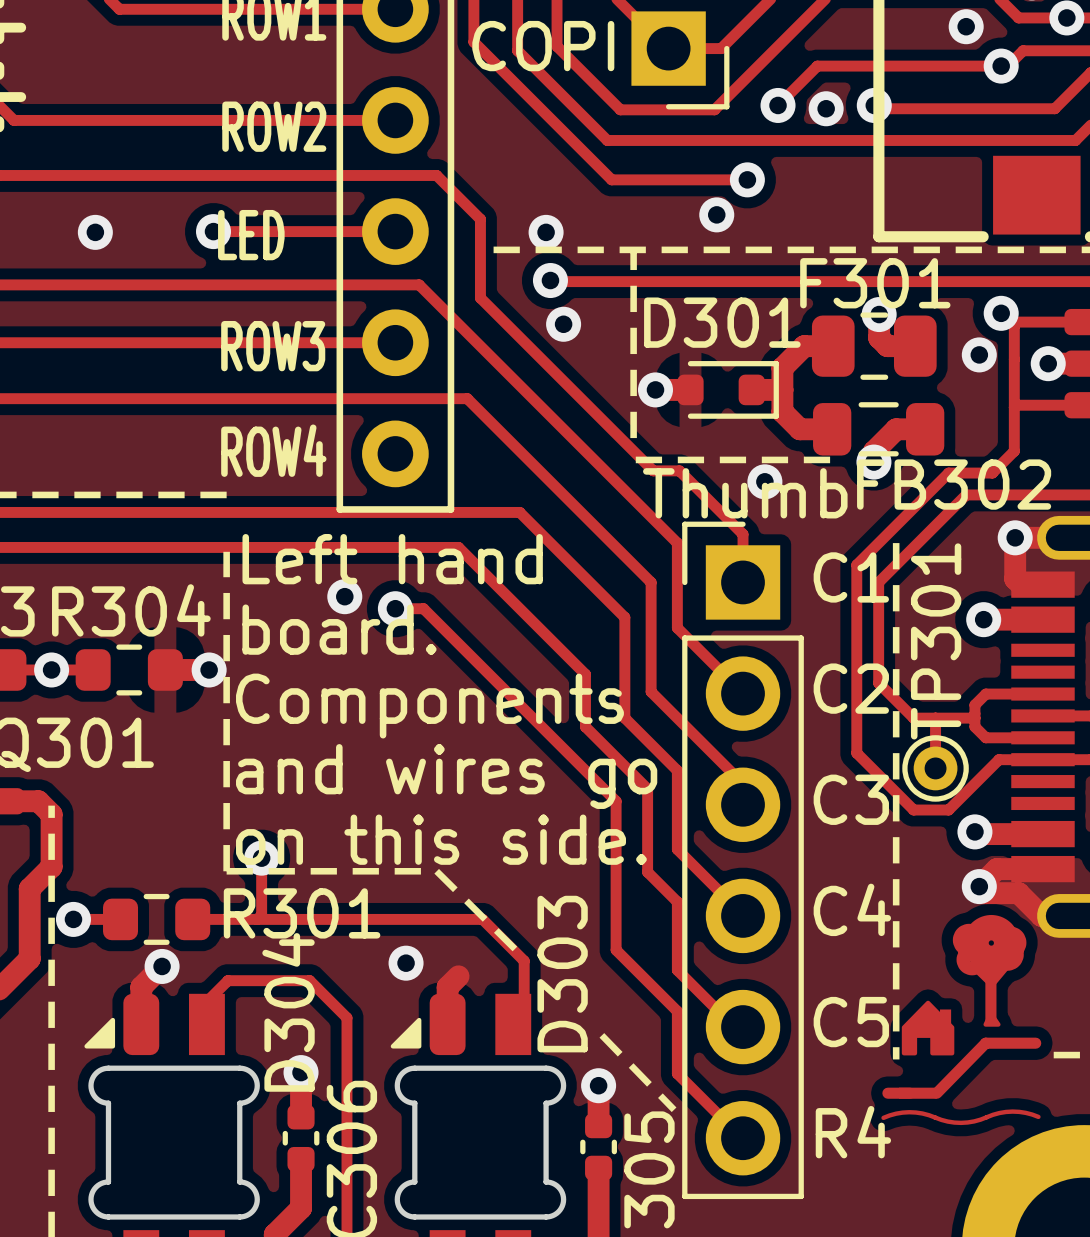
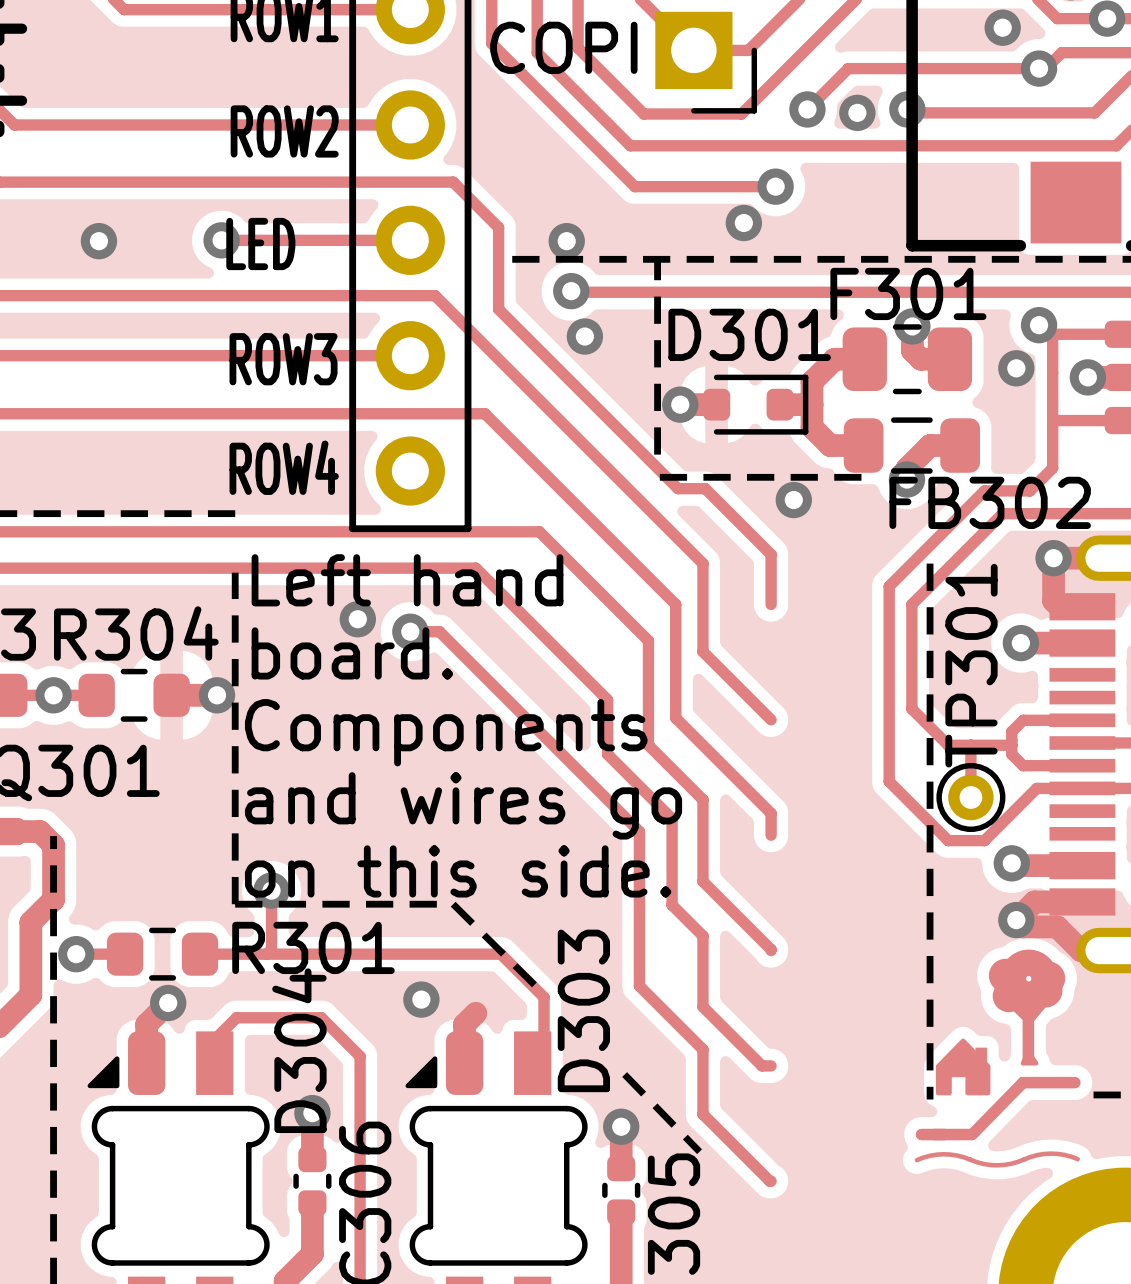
part: Thumb (743, 860) -> none

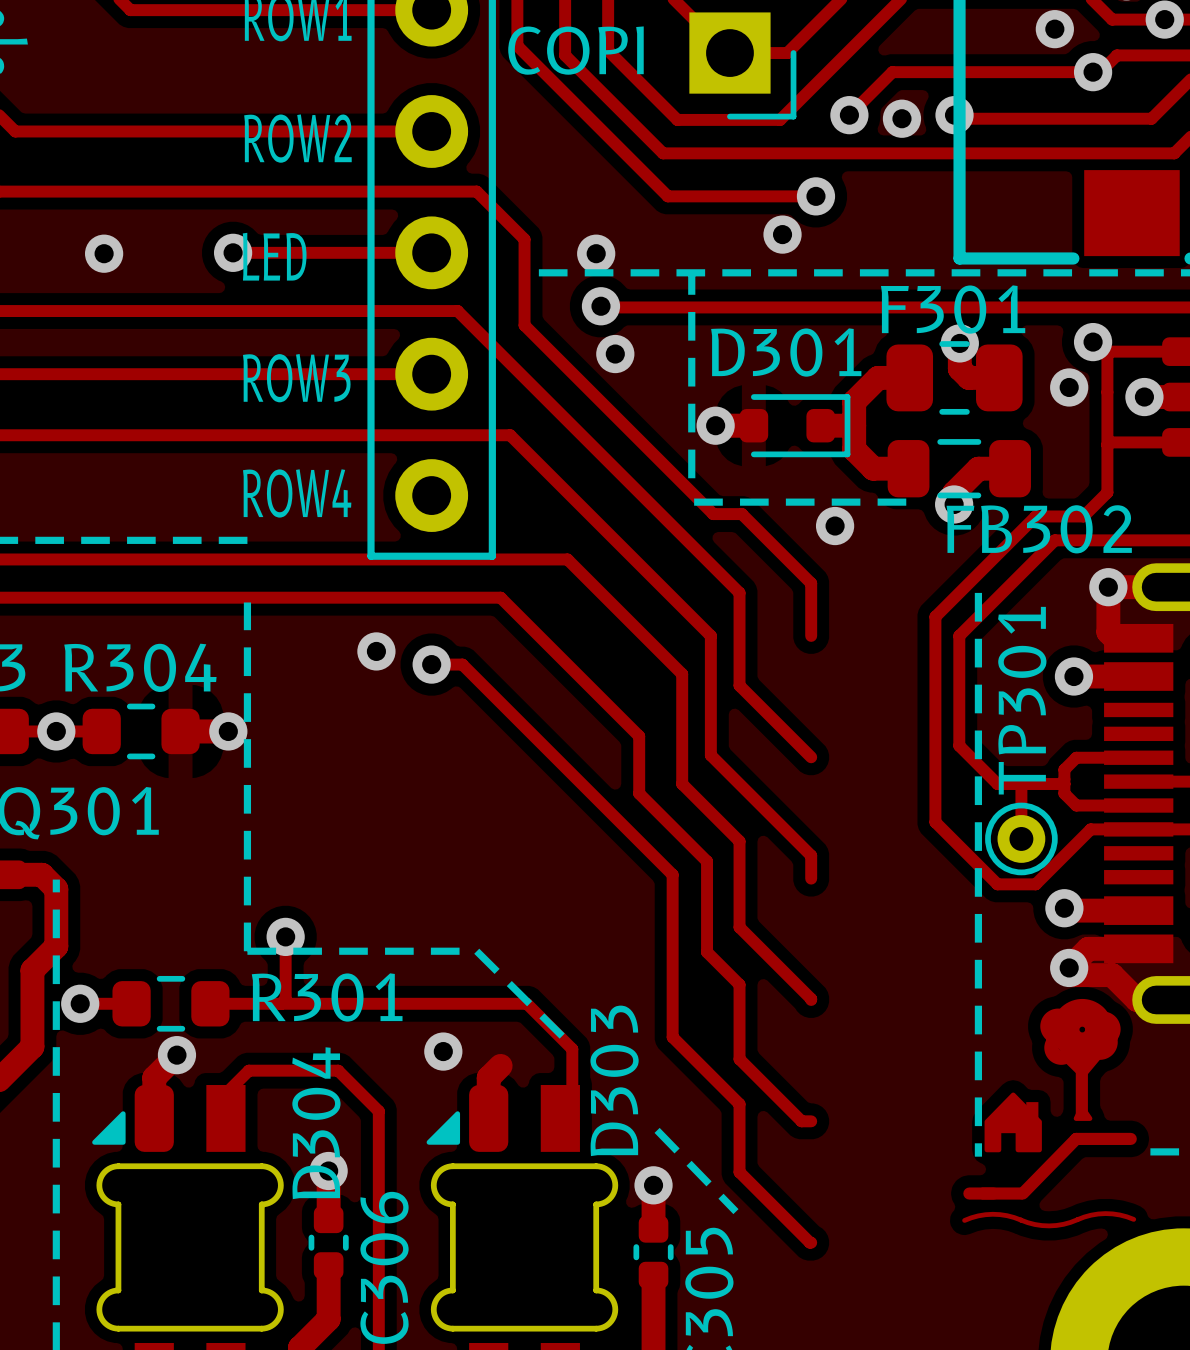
text: Left hand (407, 580) -> none
text: board. (352, 653) -> none
text: Components (446, 732) -> none
text: and wires go (463, 805) -> none
text: on this side. (458, 871) -> none

